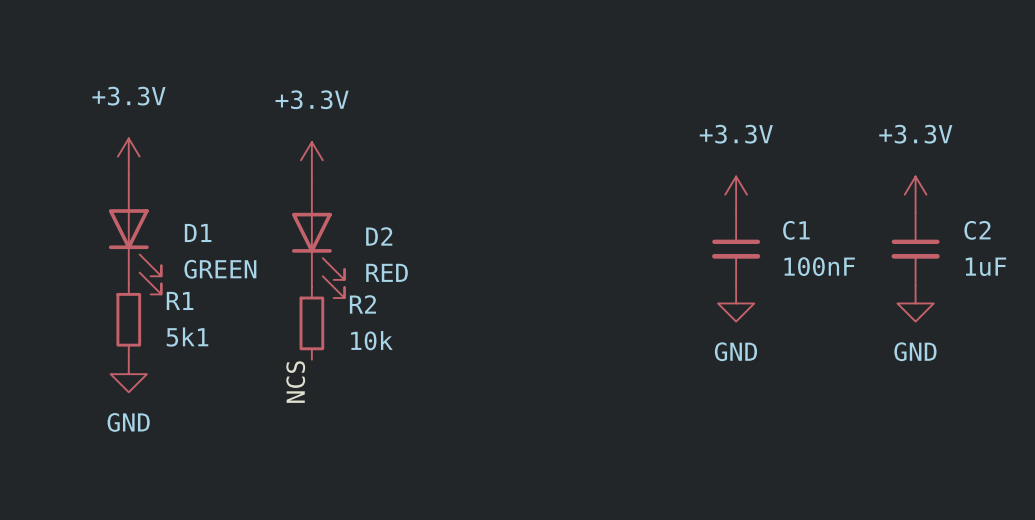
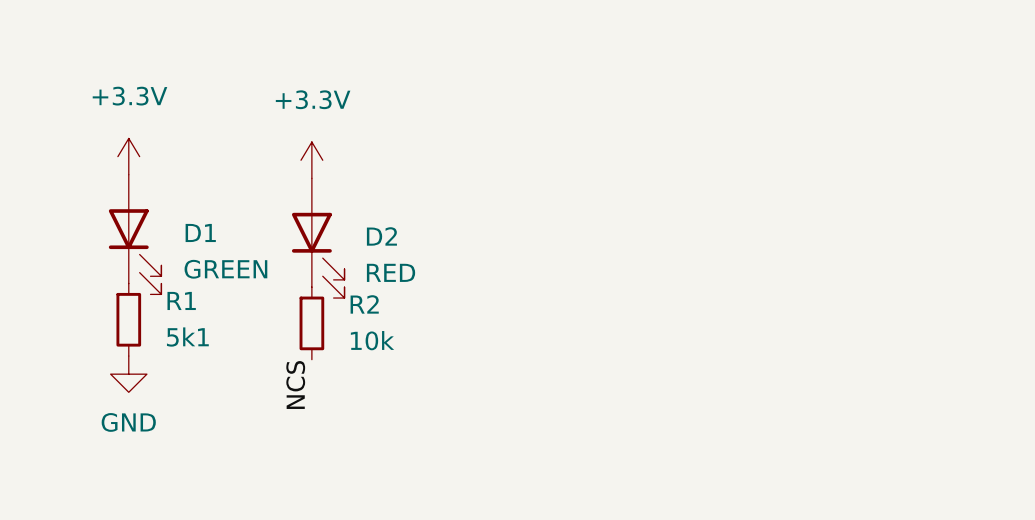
power symbol: +3.3V (736, 194) -> none
power symbol: +3.3V (915, 194) -> none
C1: 100nF (736, 249) -> none
C2: 1uF (915, 249) -> none
power symbol: GND (736, 303) -> none
power symbol: GND (915, 303) -> none

